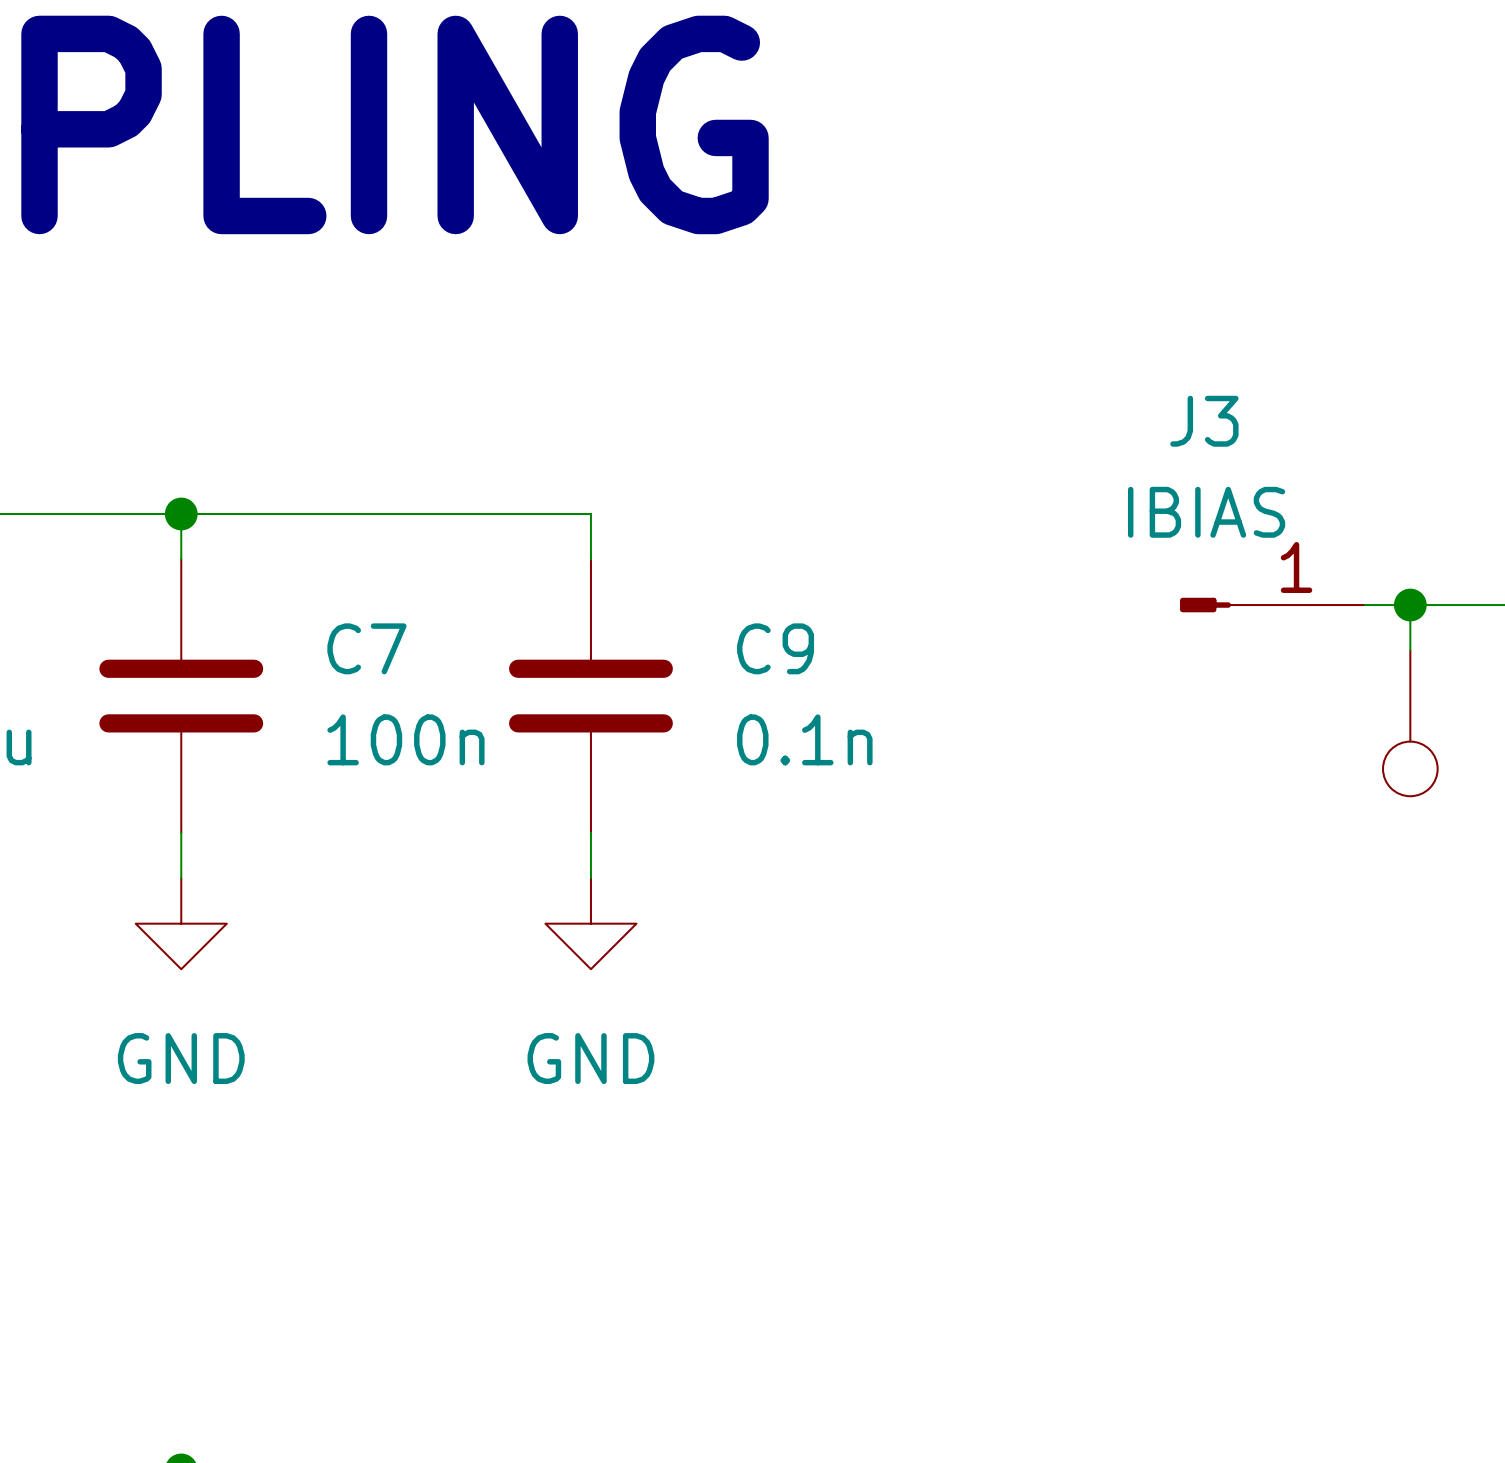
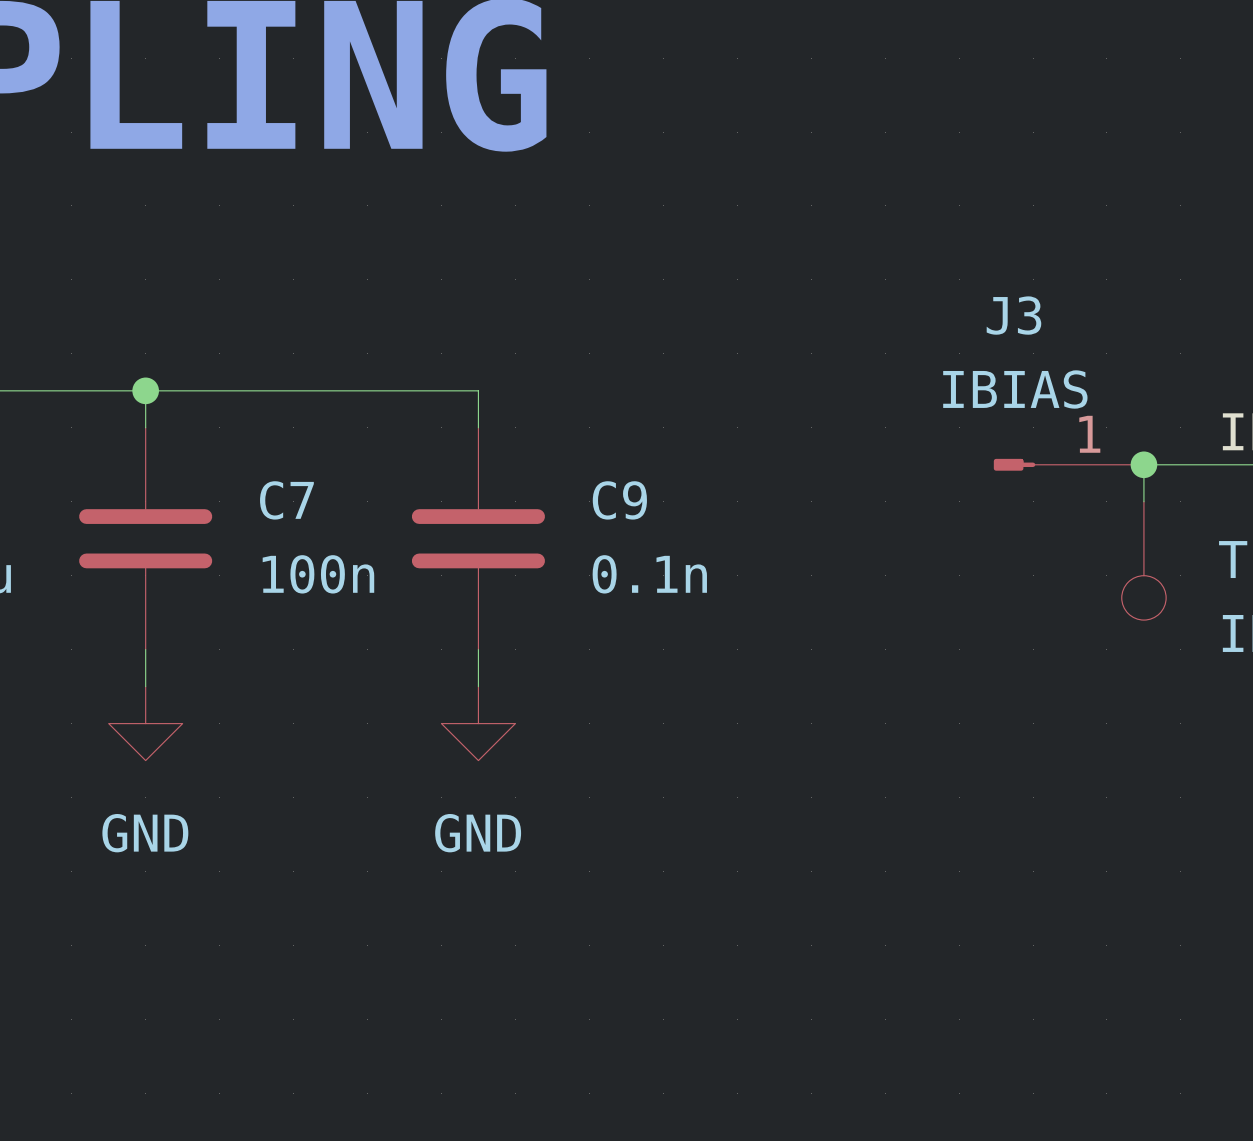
J3 position: (1272, 605) -> (1068, 464)

